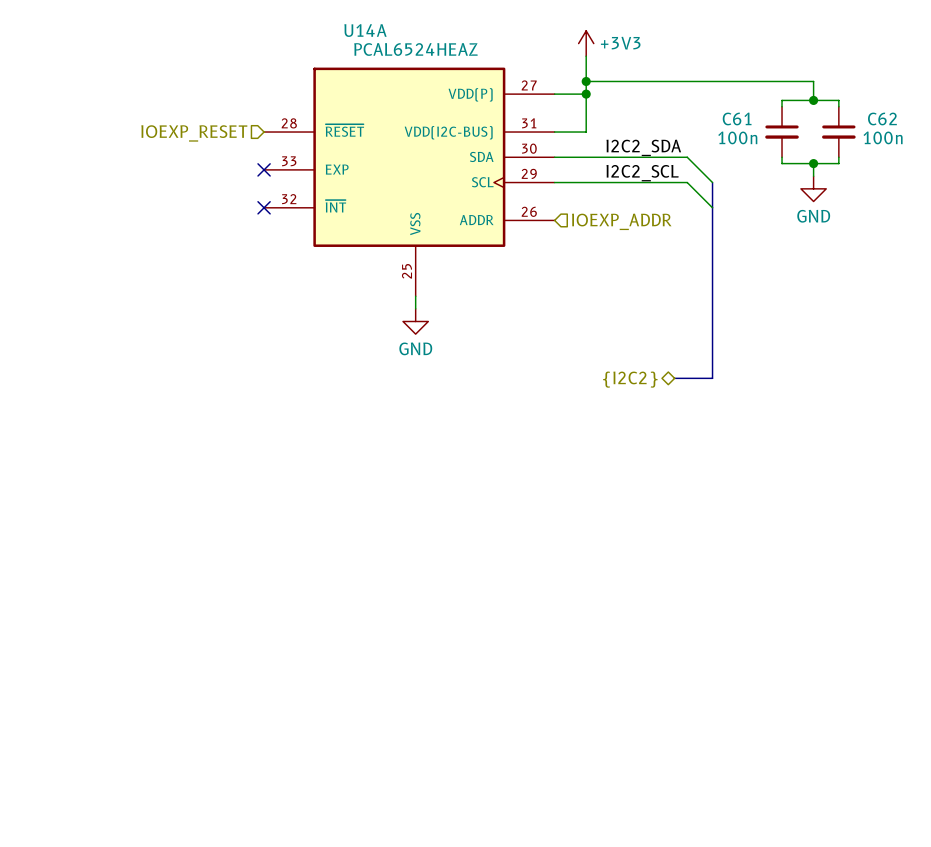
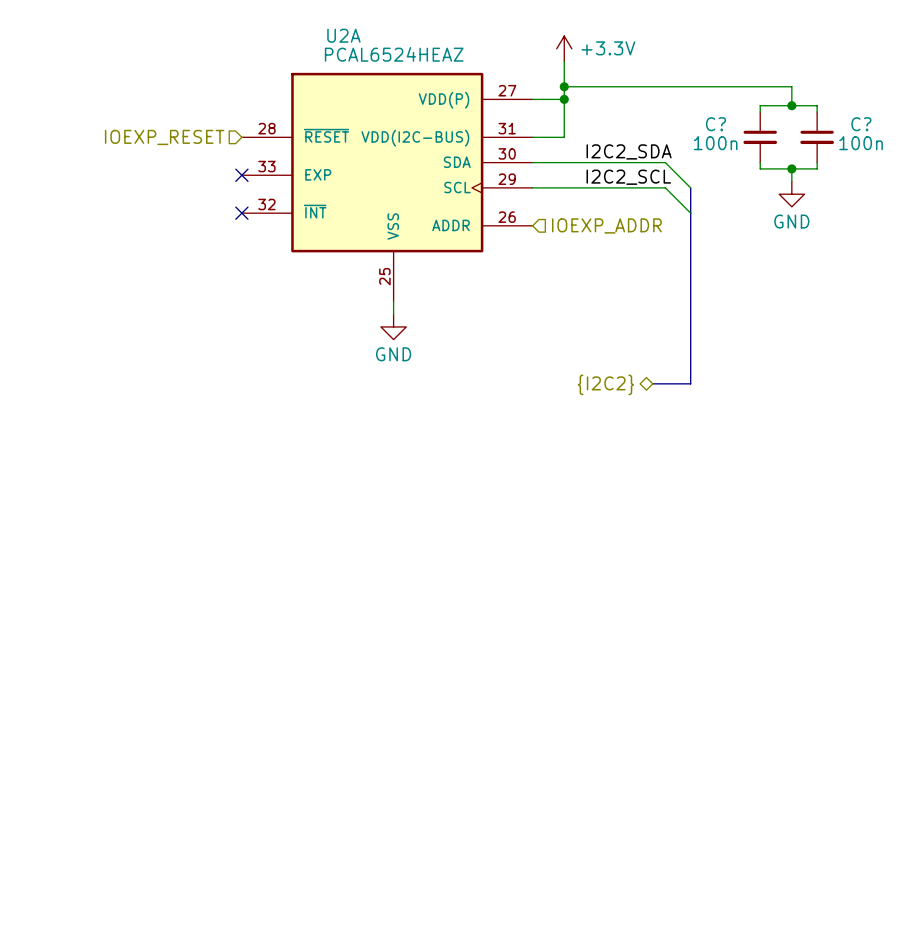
U14A name: U14A (365, 30) -> U2A (343, 35)
power symbol: +3V3 (586, 43) -> +3.3V (564, 48)
C61 name: C61 (737, 118) -> C? (715, 124)
C62 name: C62 (882, 118) -> C? (861, 124)

